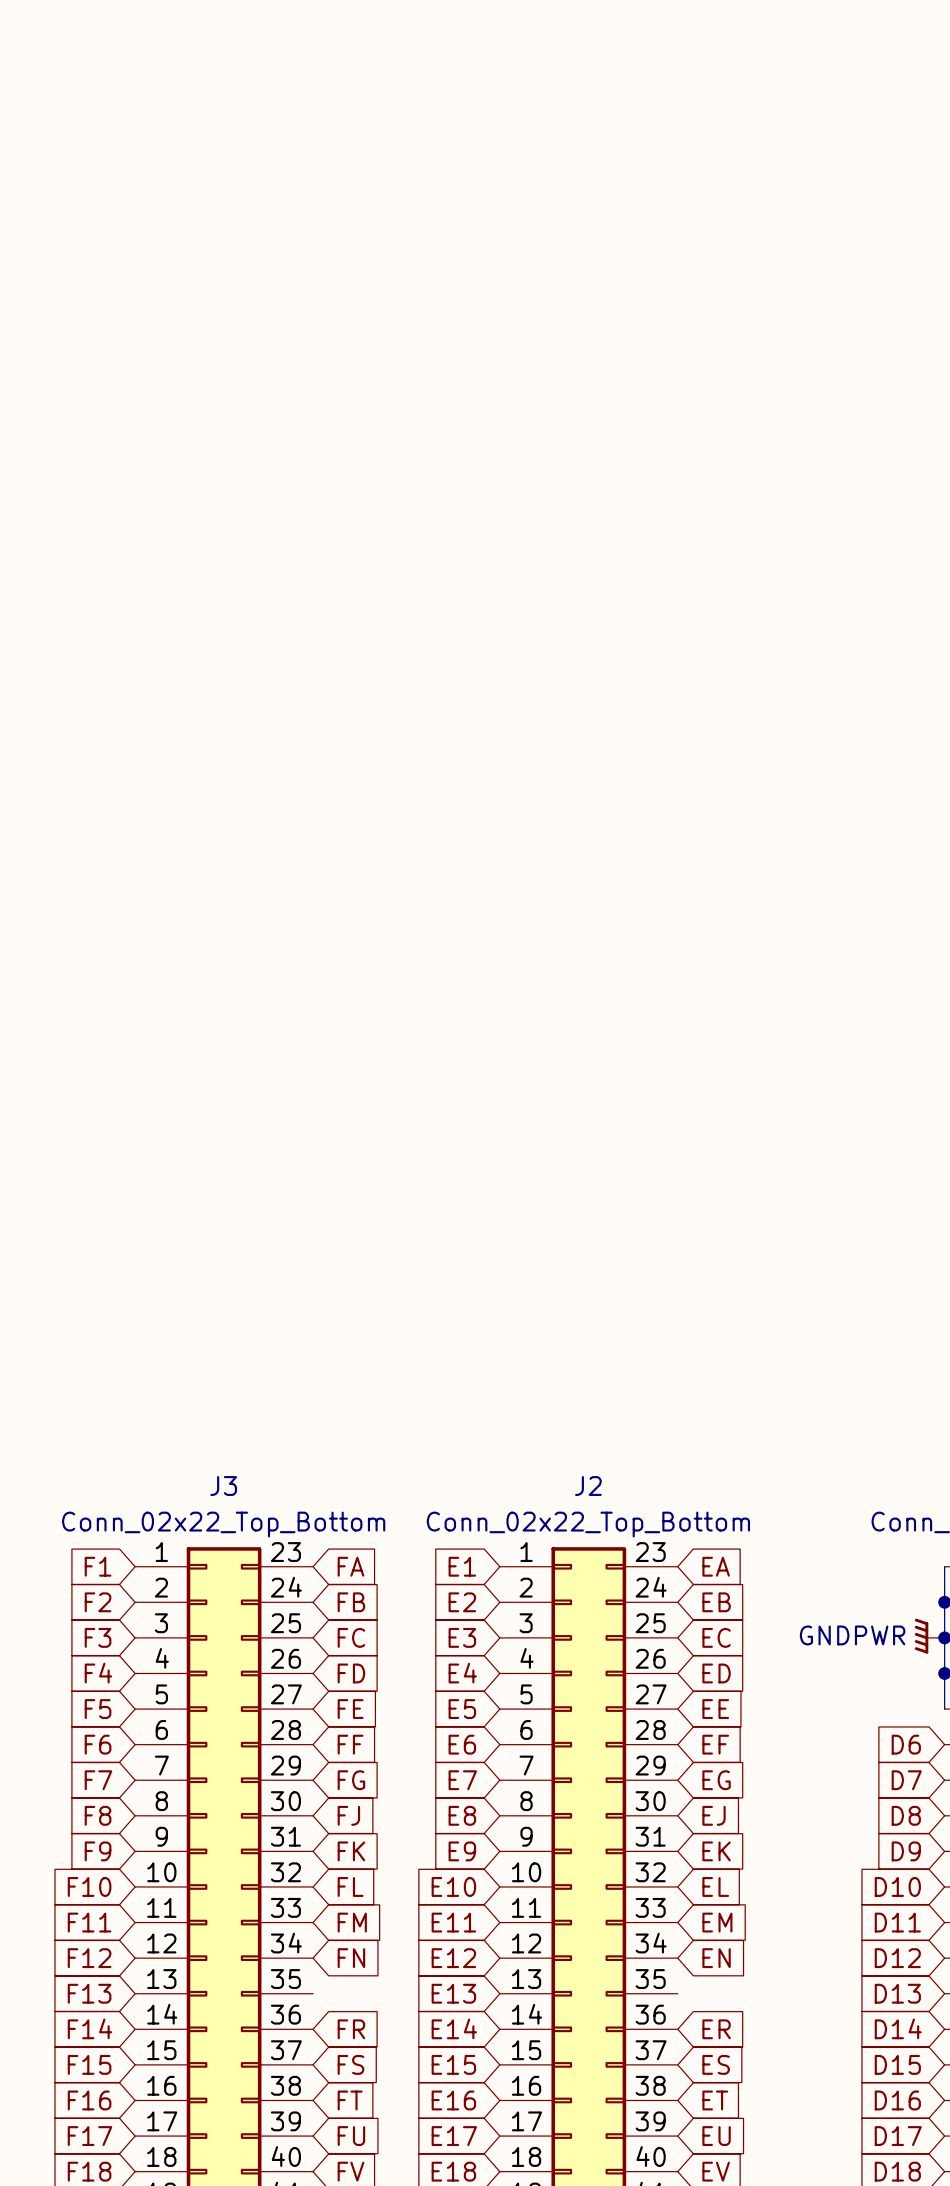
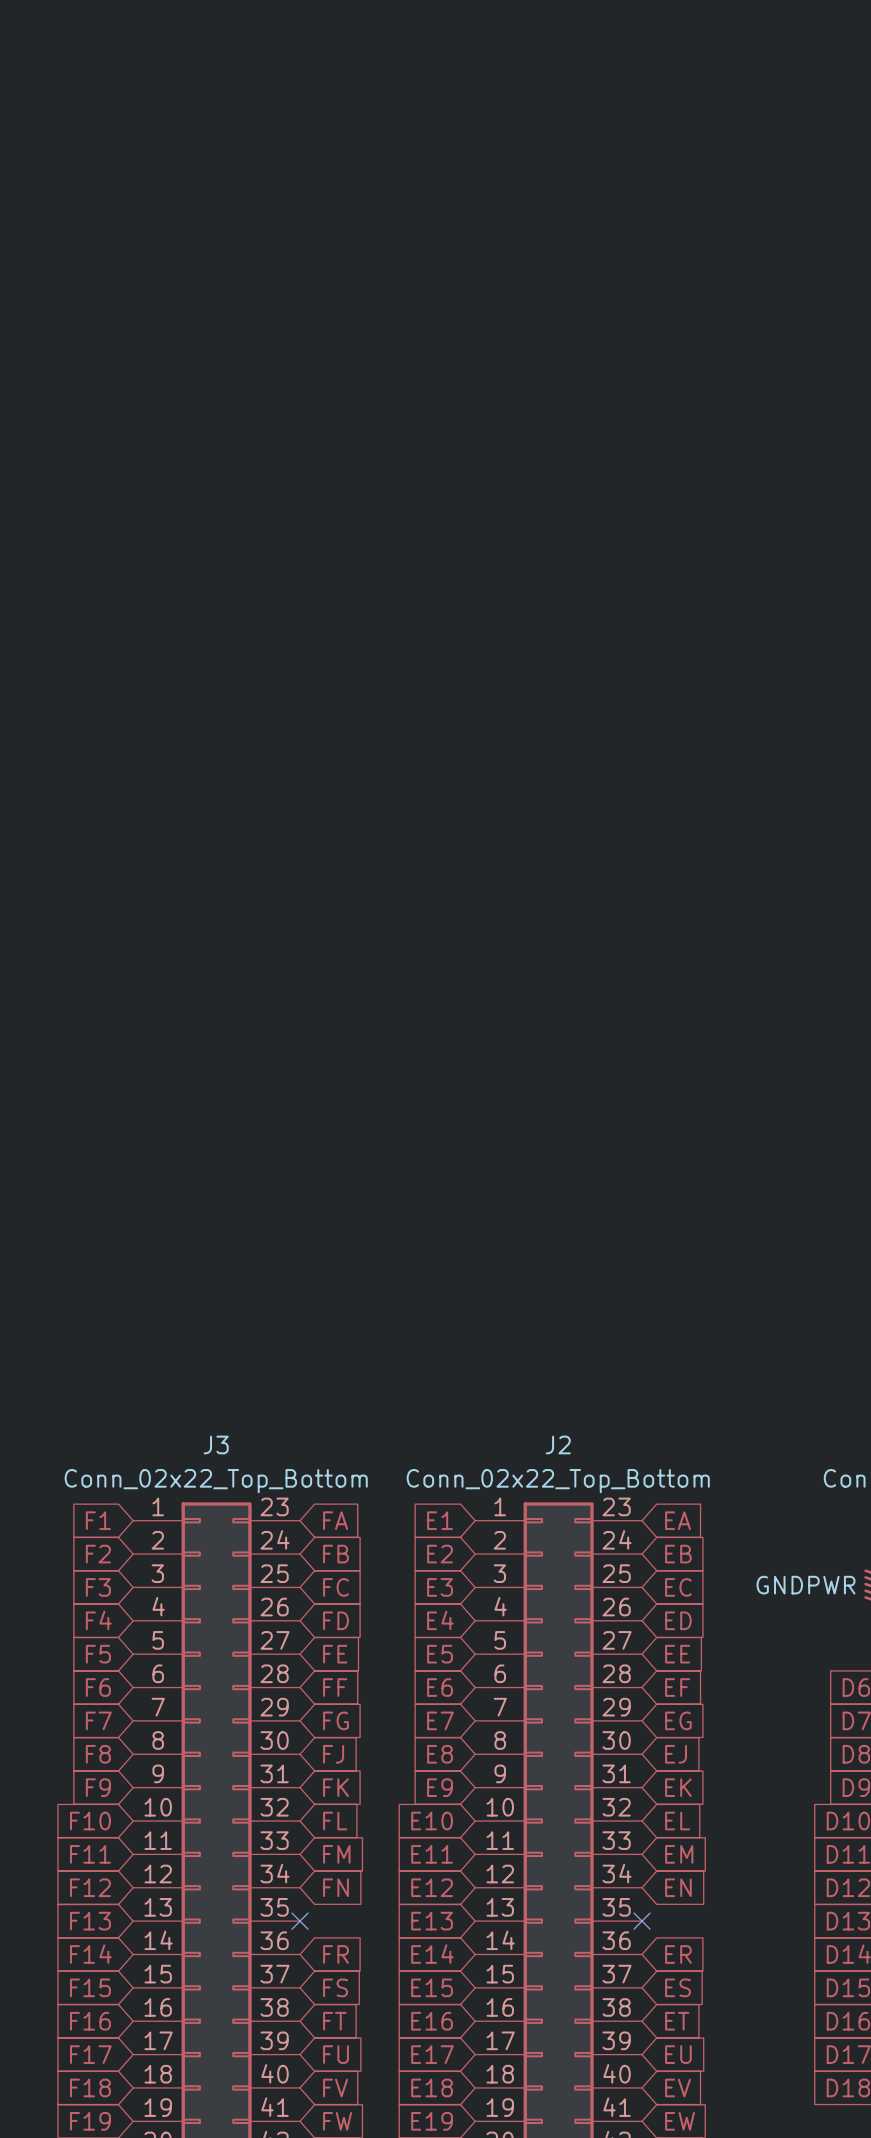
no-connect mark: none -> (300, 1921)
no-connect mark: none -> (642, 1921)

